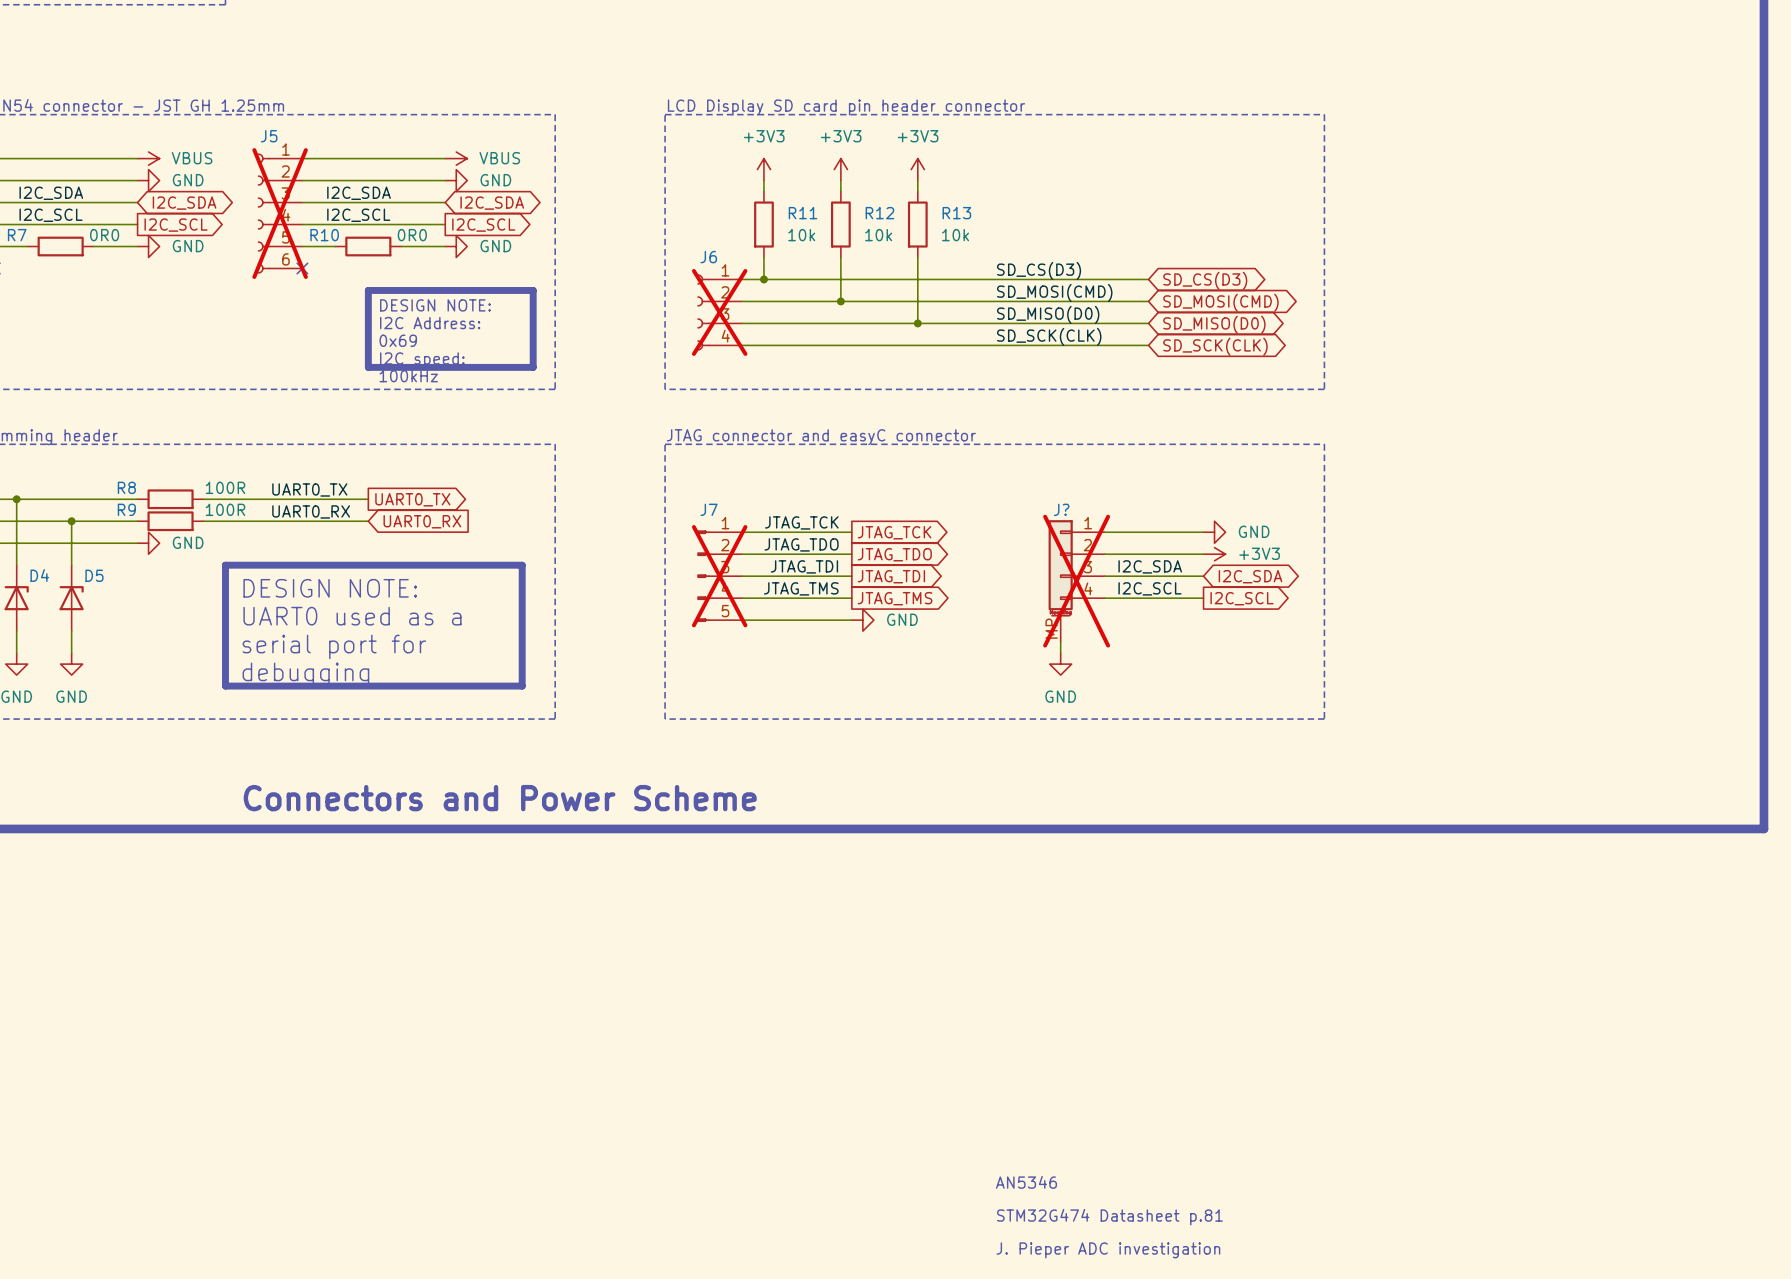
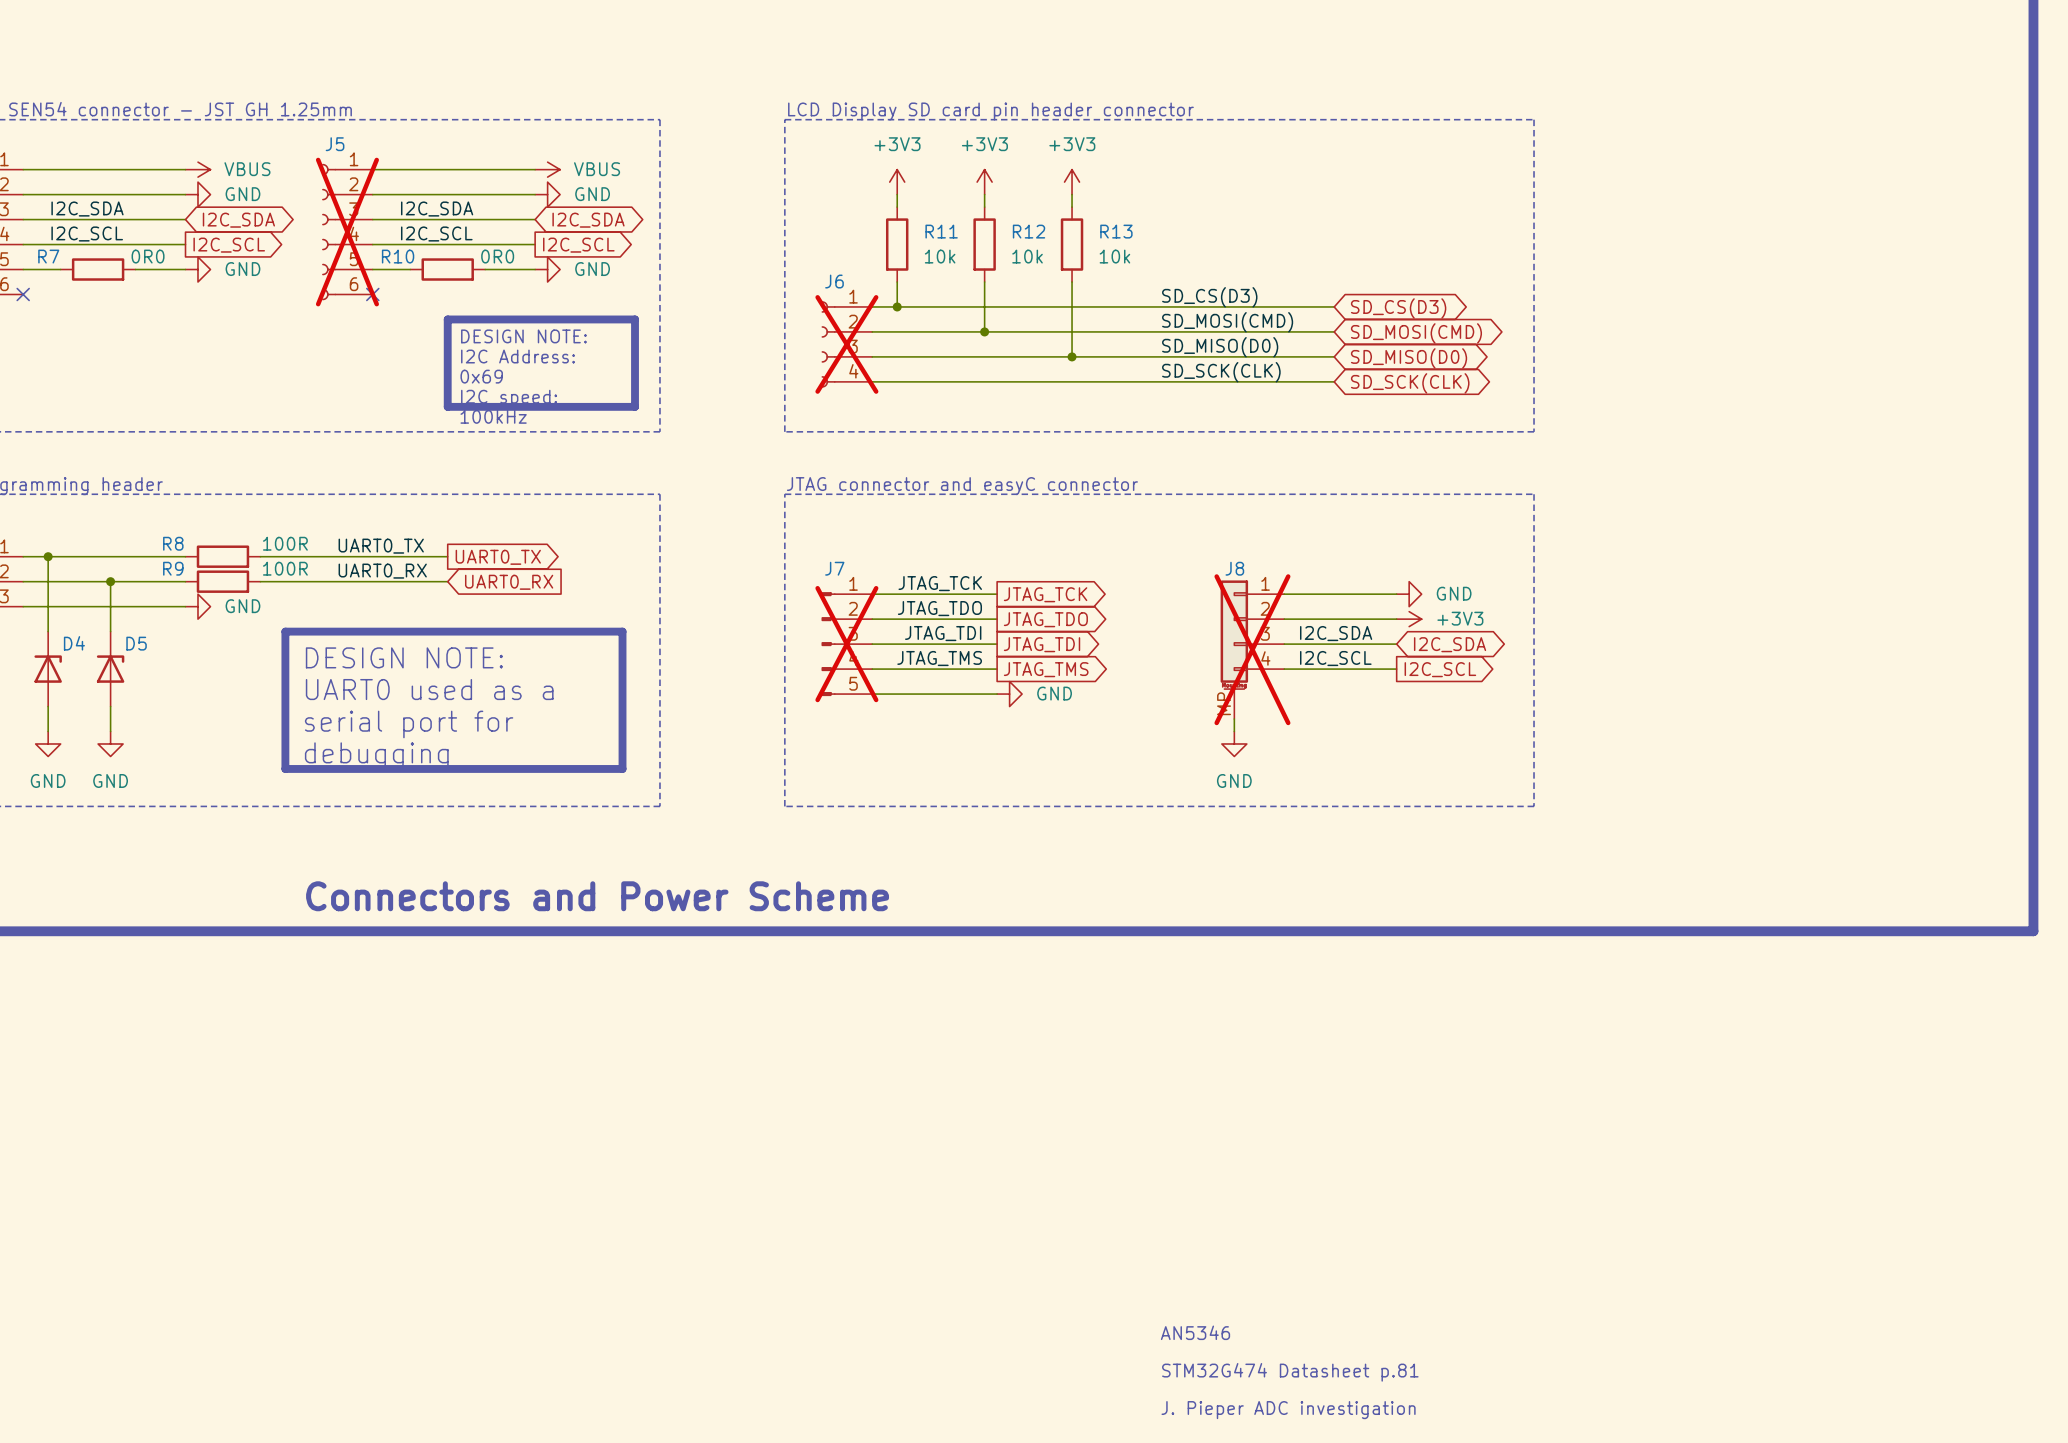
J? name: J? (1061, 509) -> J8 (1234, 568)

